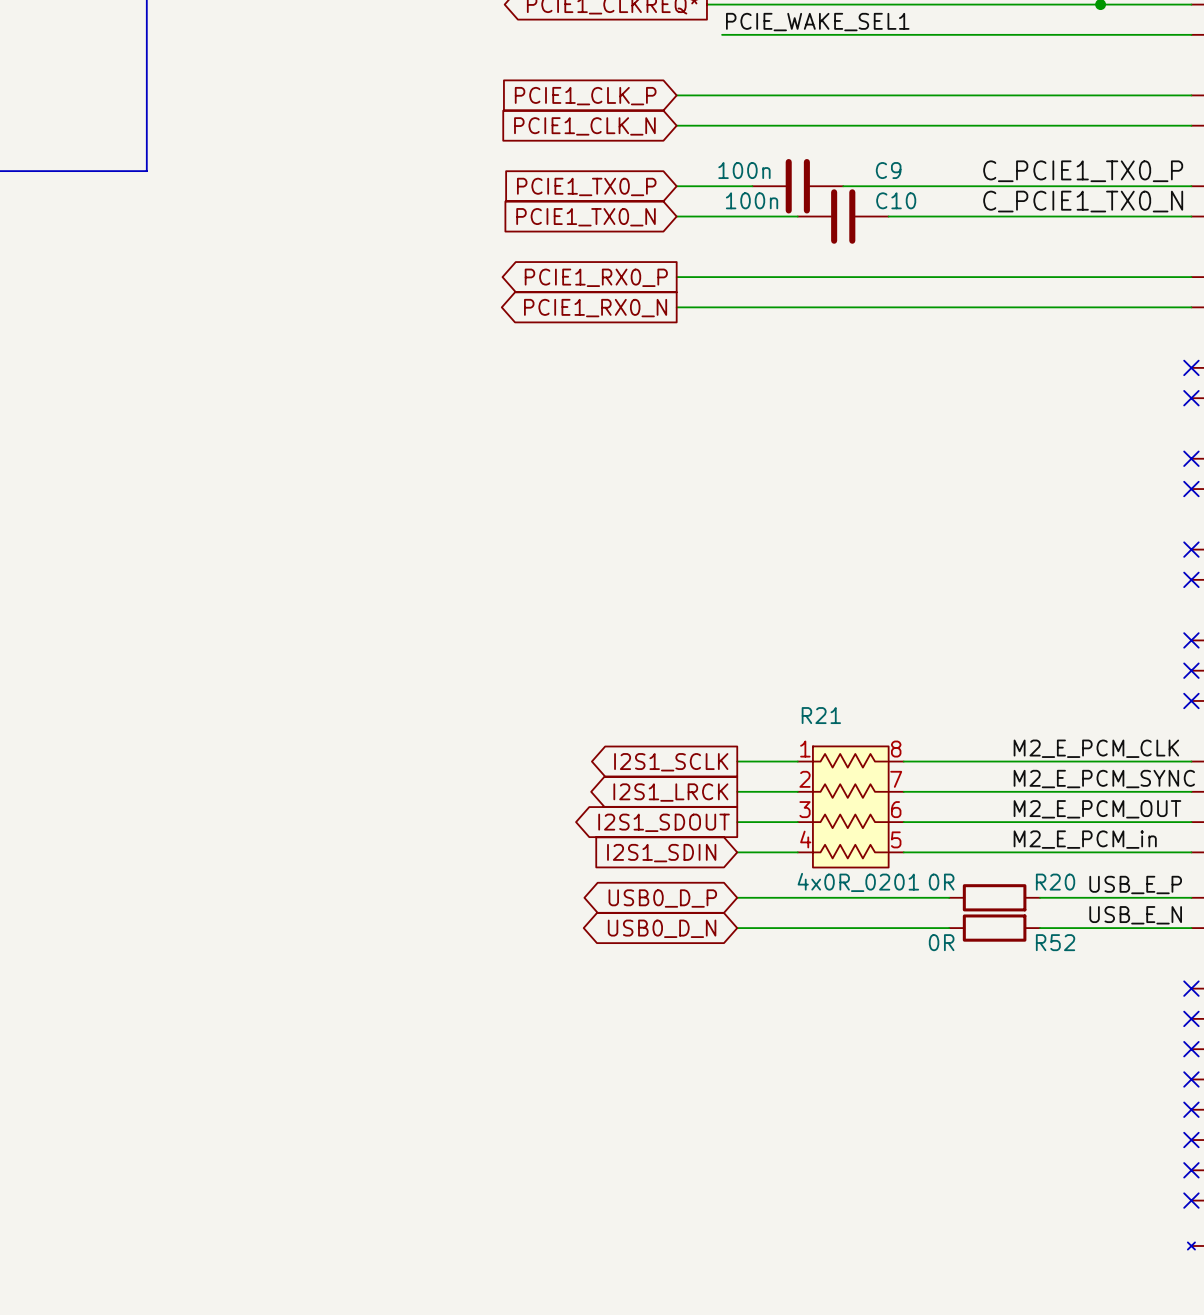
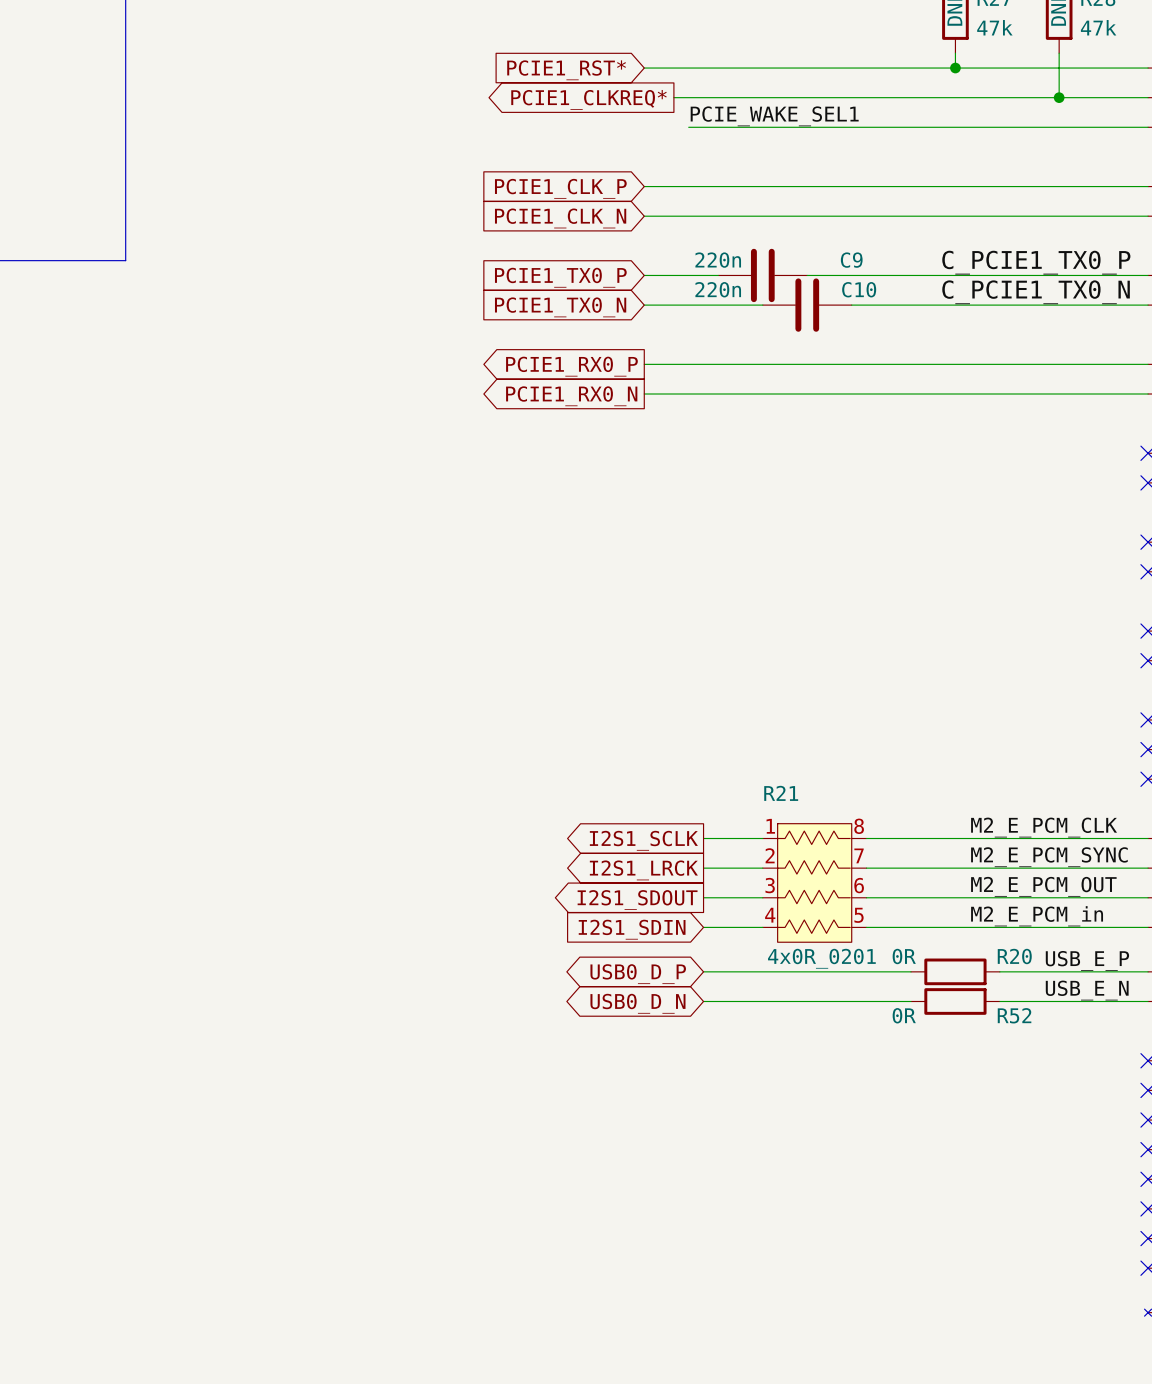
C9 text: 100n (744, 170) -> 220n (718, 260)
C10 text: 100n (752, 200) -> 220n (718, 289)

